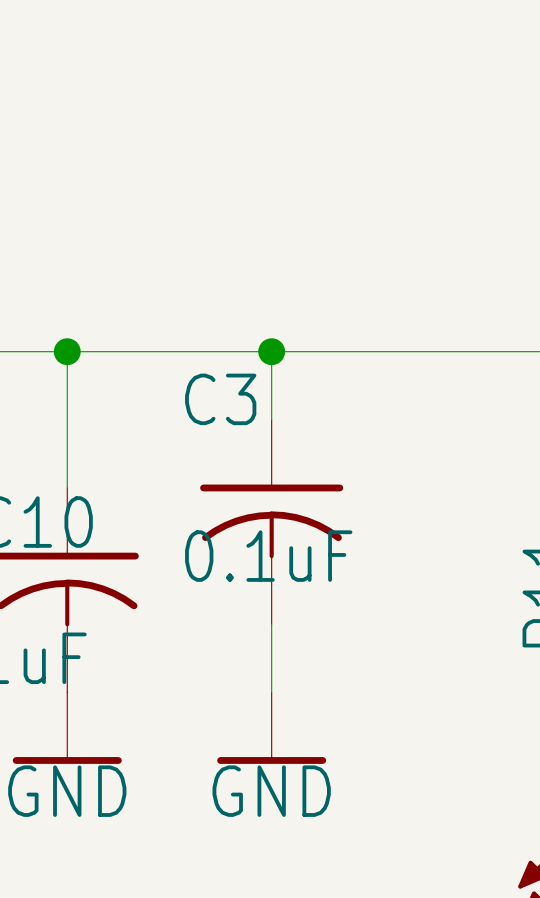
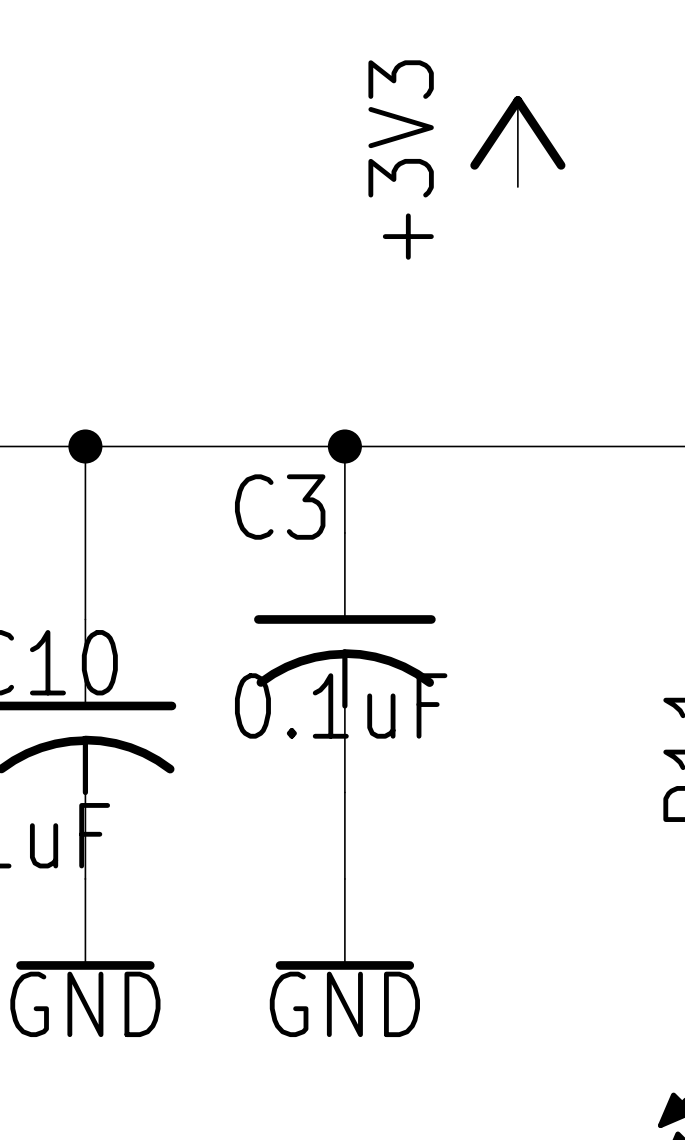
power symbol: none -> +3V3 (517, 141)

